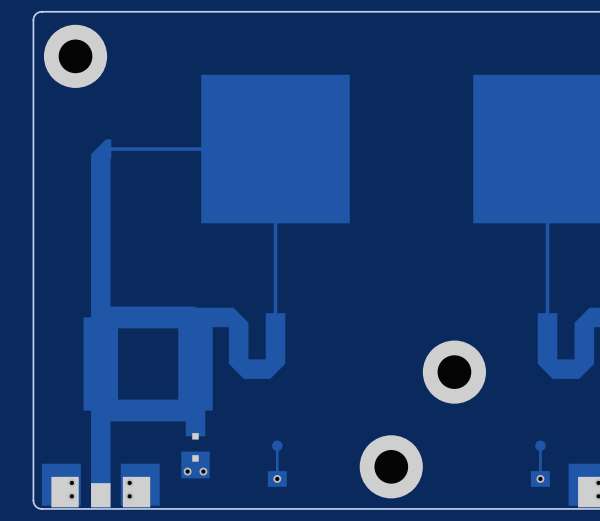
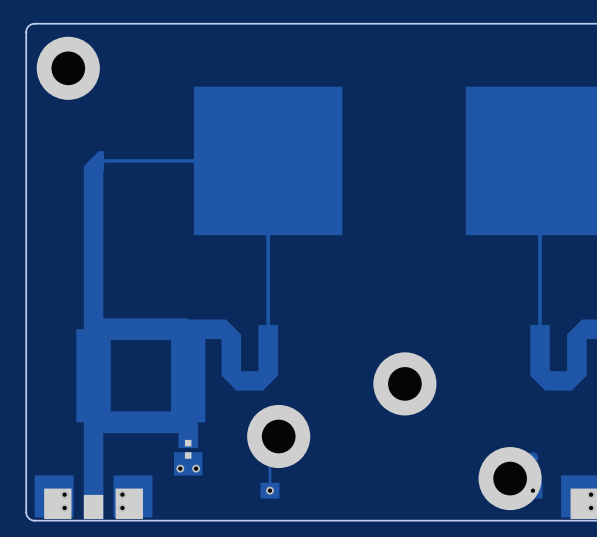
part position: (454, 372) -> (404, 383)
part: none -> (278, 436)
part footprint: [192, 433, 199, 462] -> [184, 439, 192, 459]
drawing: none -> [174, 452, 203, 476]
drawing: [181, 451, 210, 479] -> none
via: none -> (180, 468)
via: none -> (196, 468)
part: (391, 466) -> none
part: none -> (510, 478)
via: (187, 471) -> none
via: (203, 471) -> none

